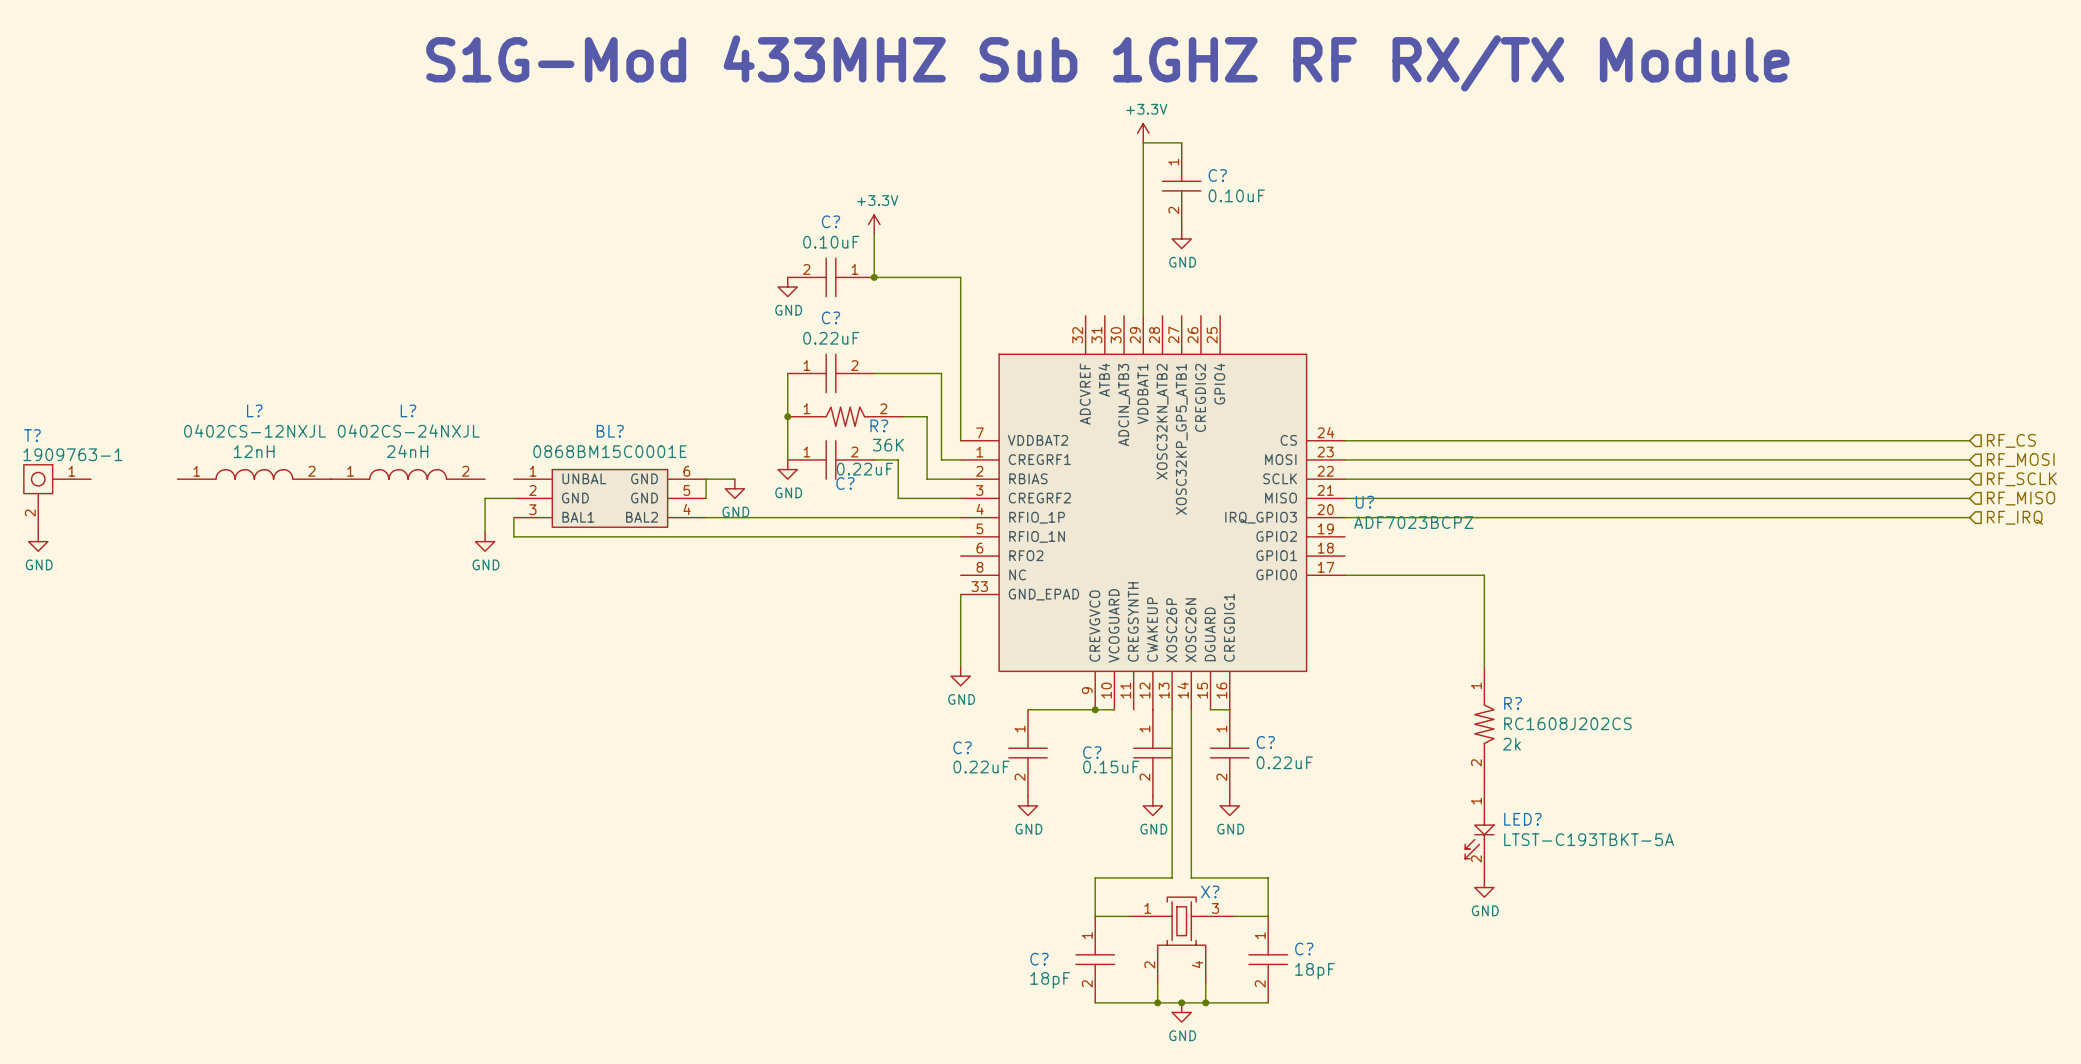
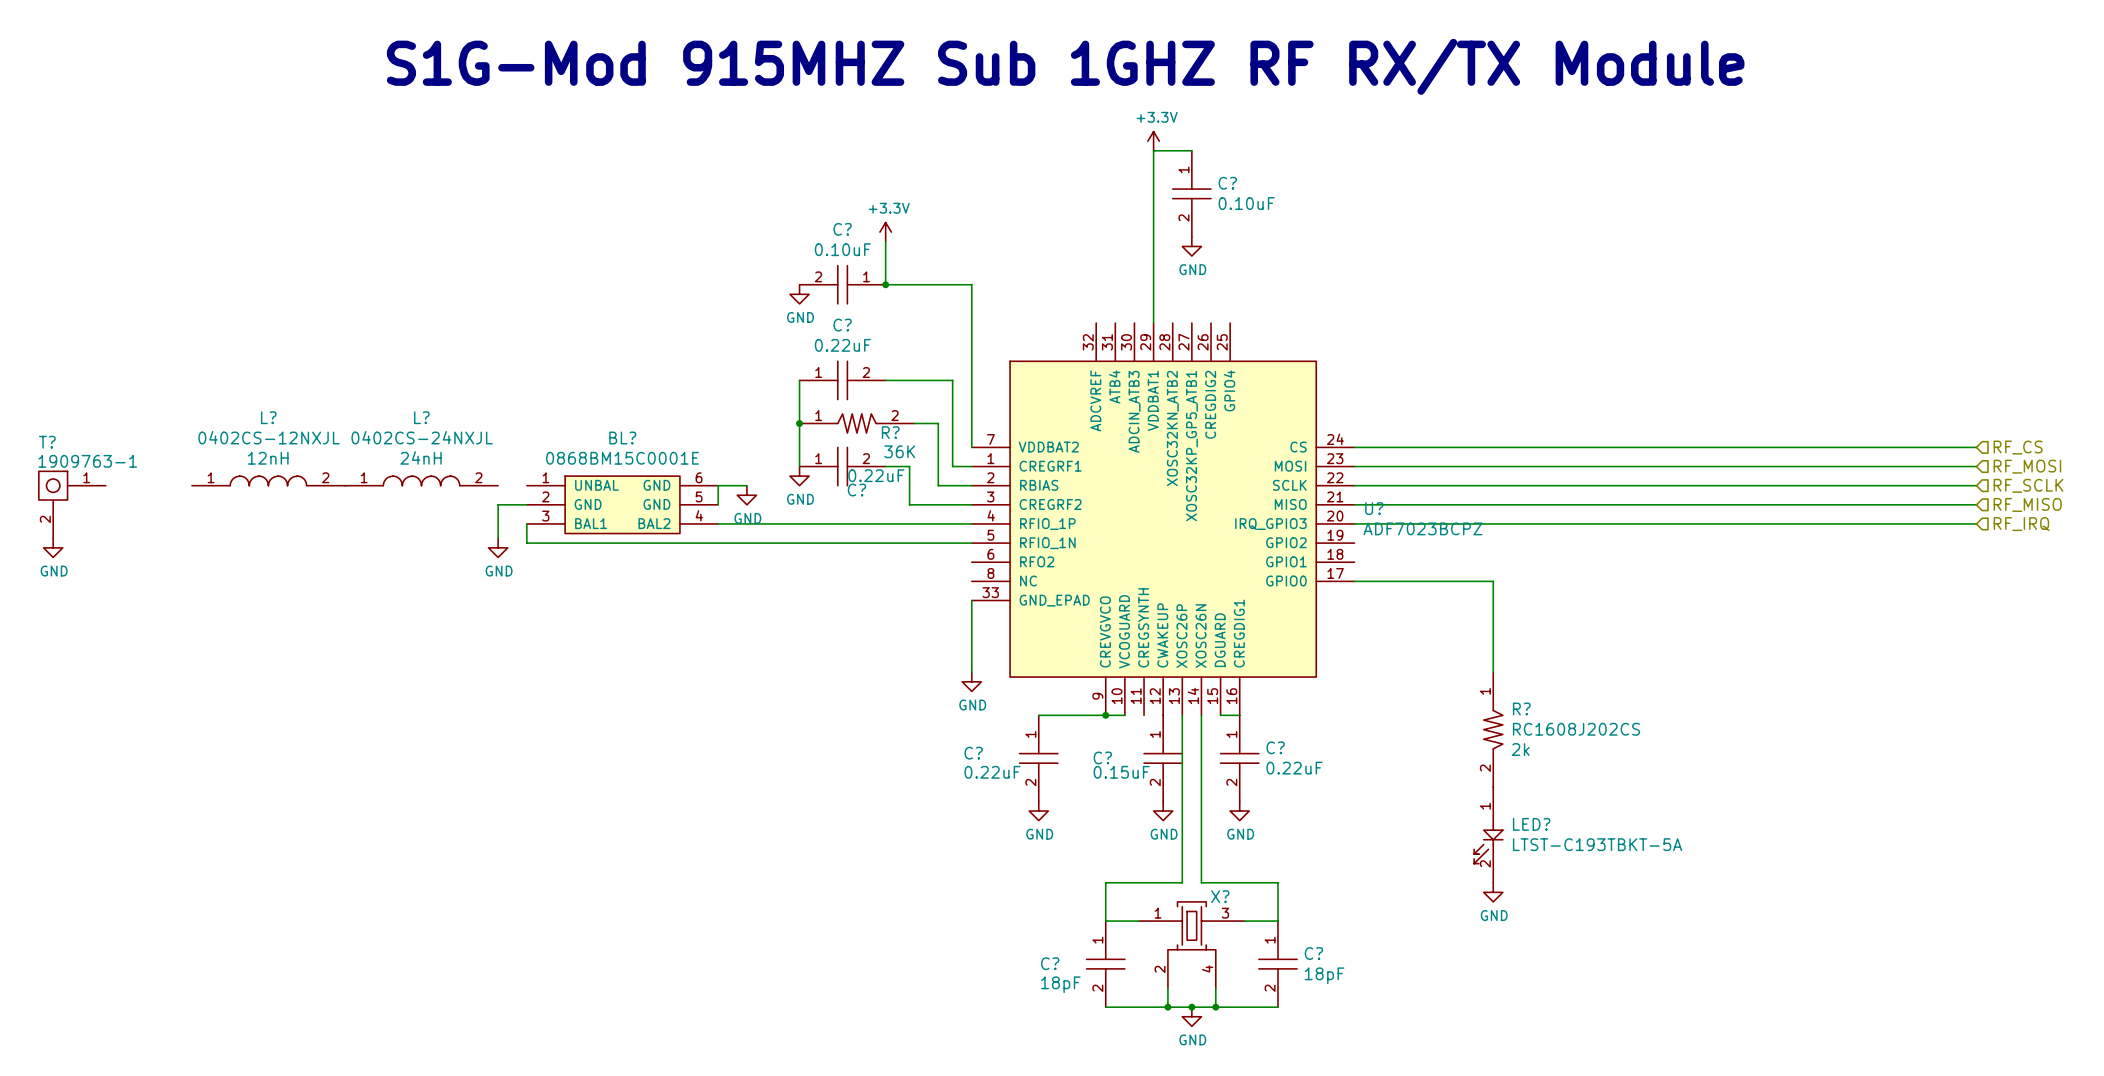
text: S1G-Mod 433MHZ Sub 1GHZ RF RX/TX Module (1107, 63) -> S1G-Mod 915MHZ Sub 1GHZ RF RX/TX Module (1065, 66)

